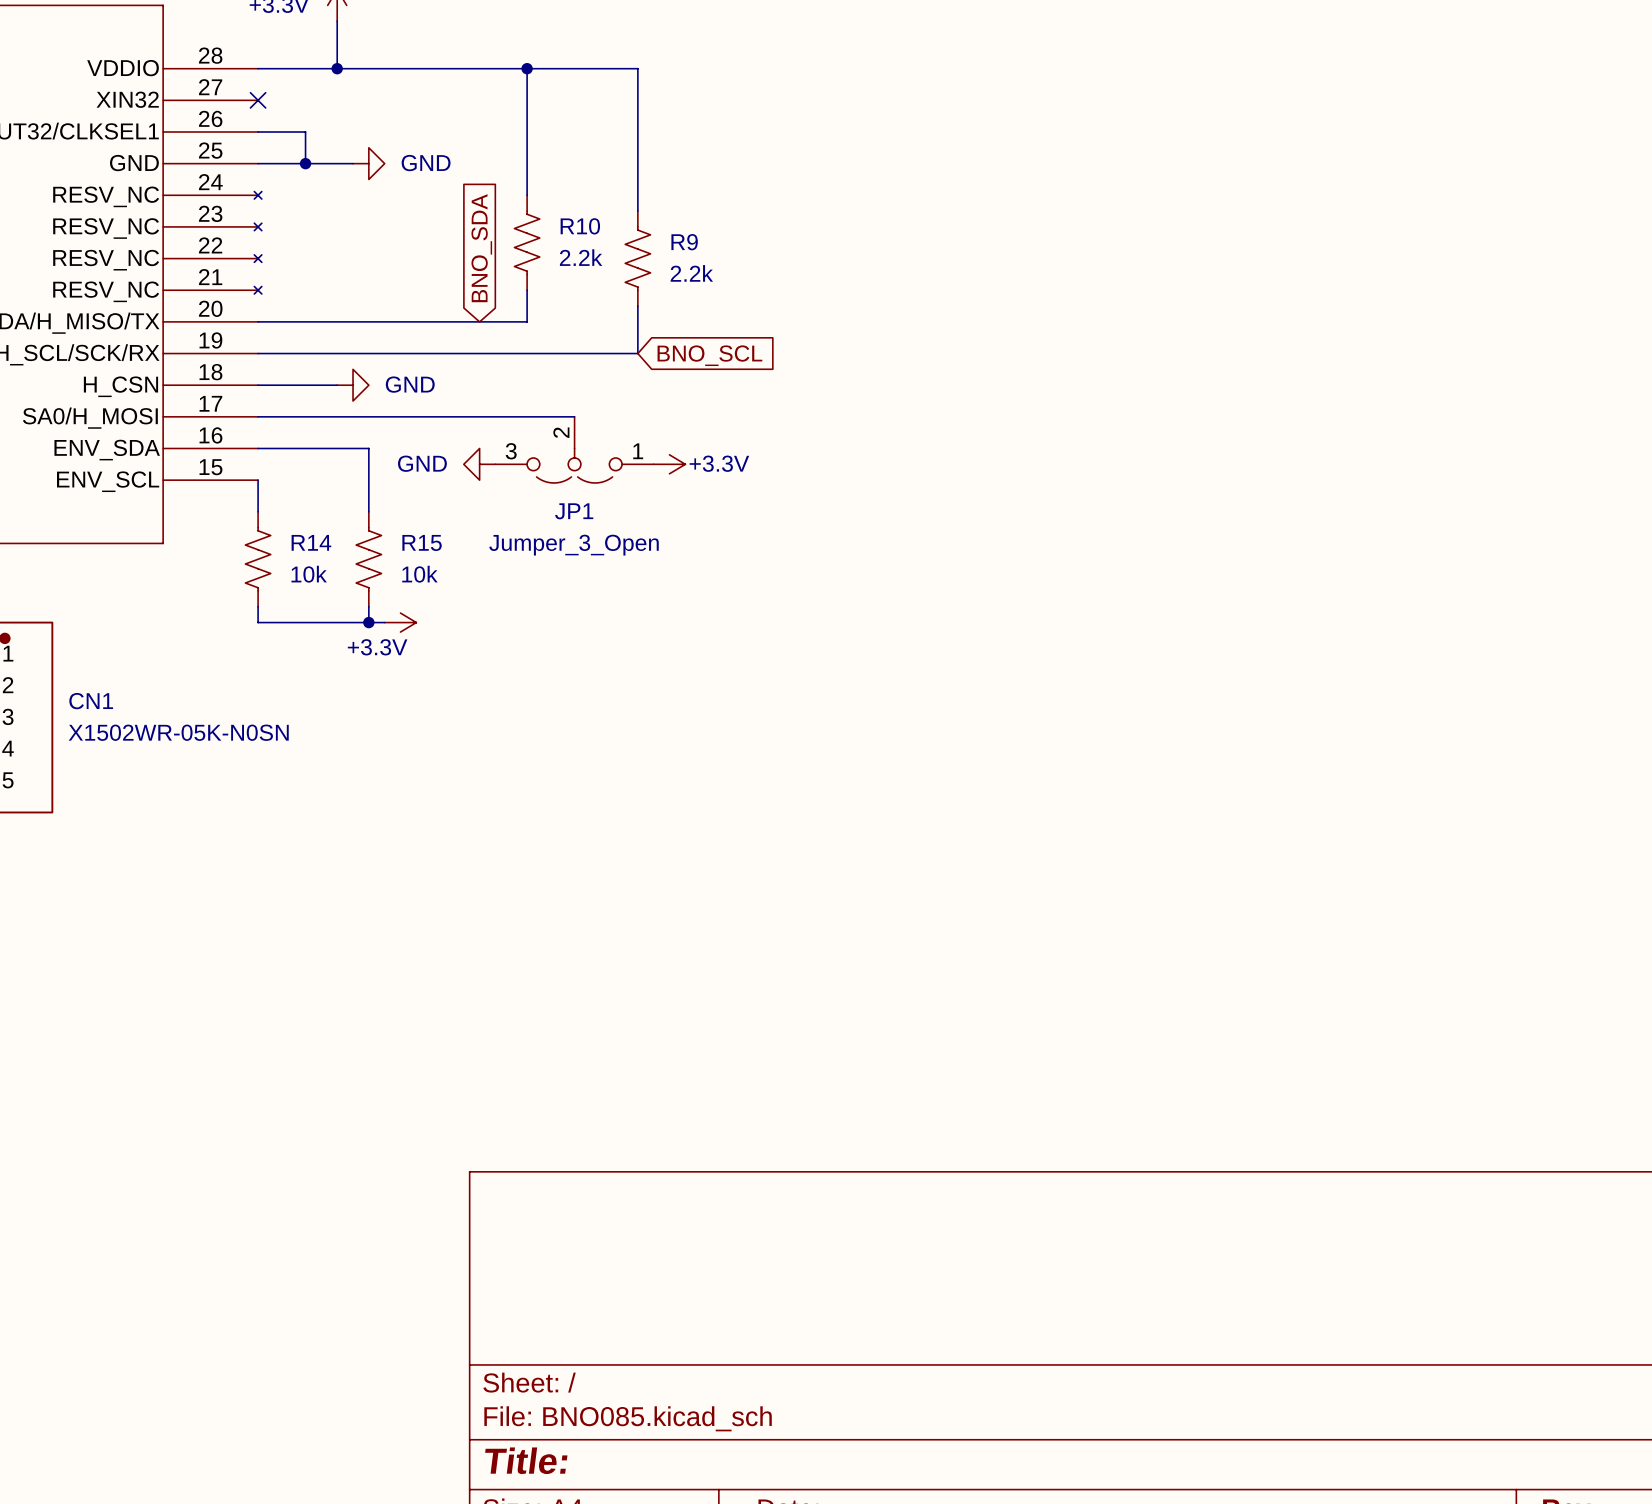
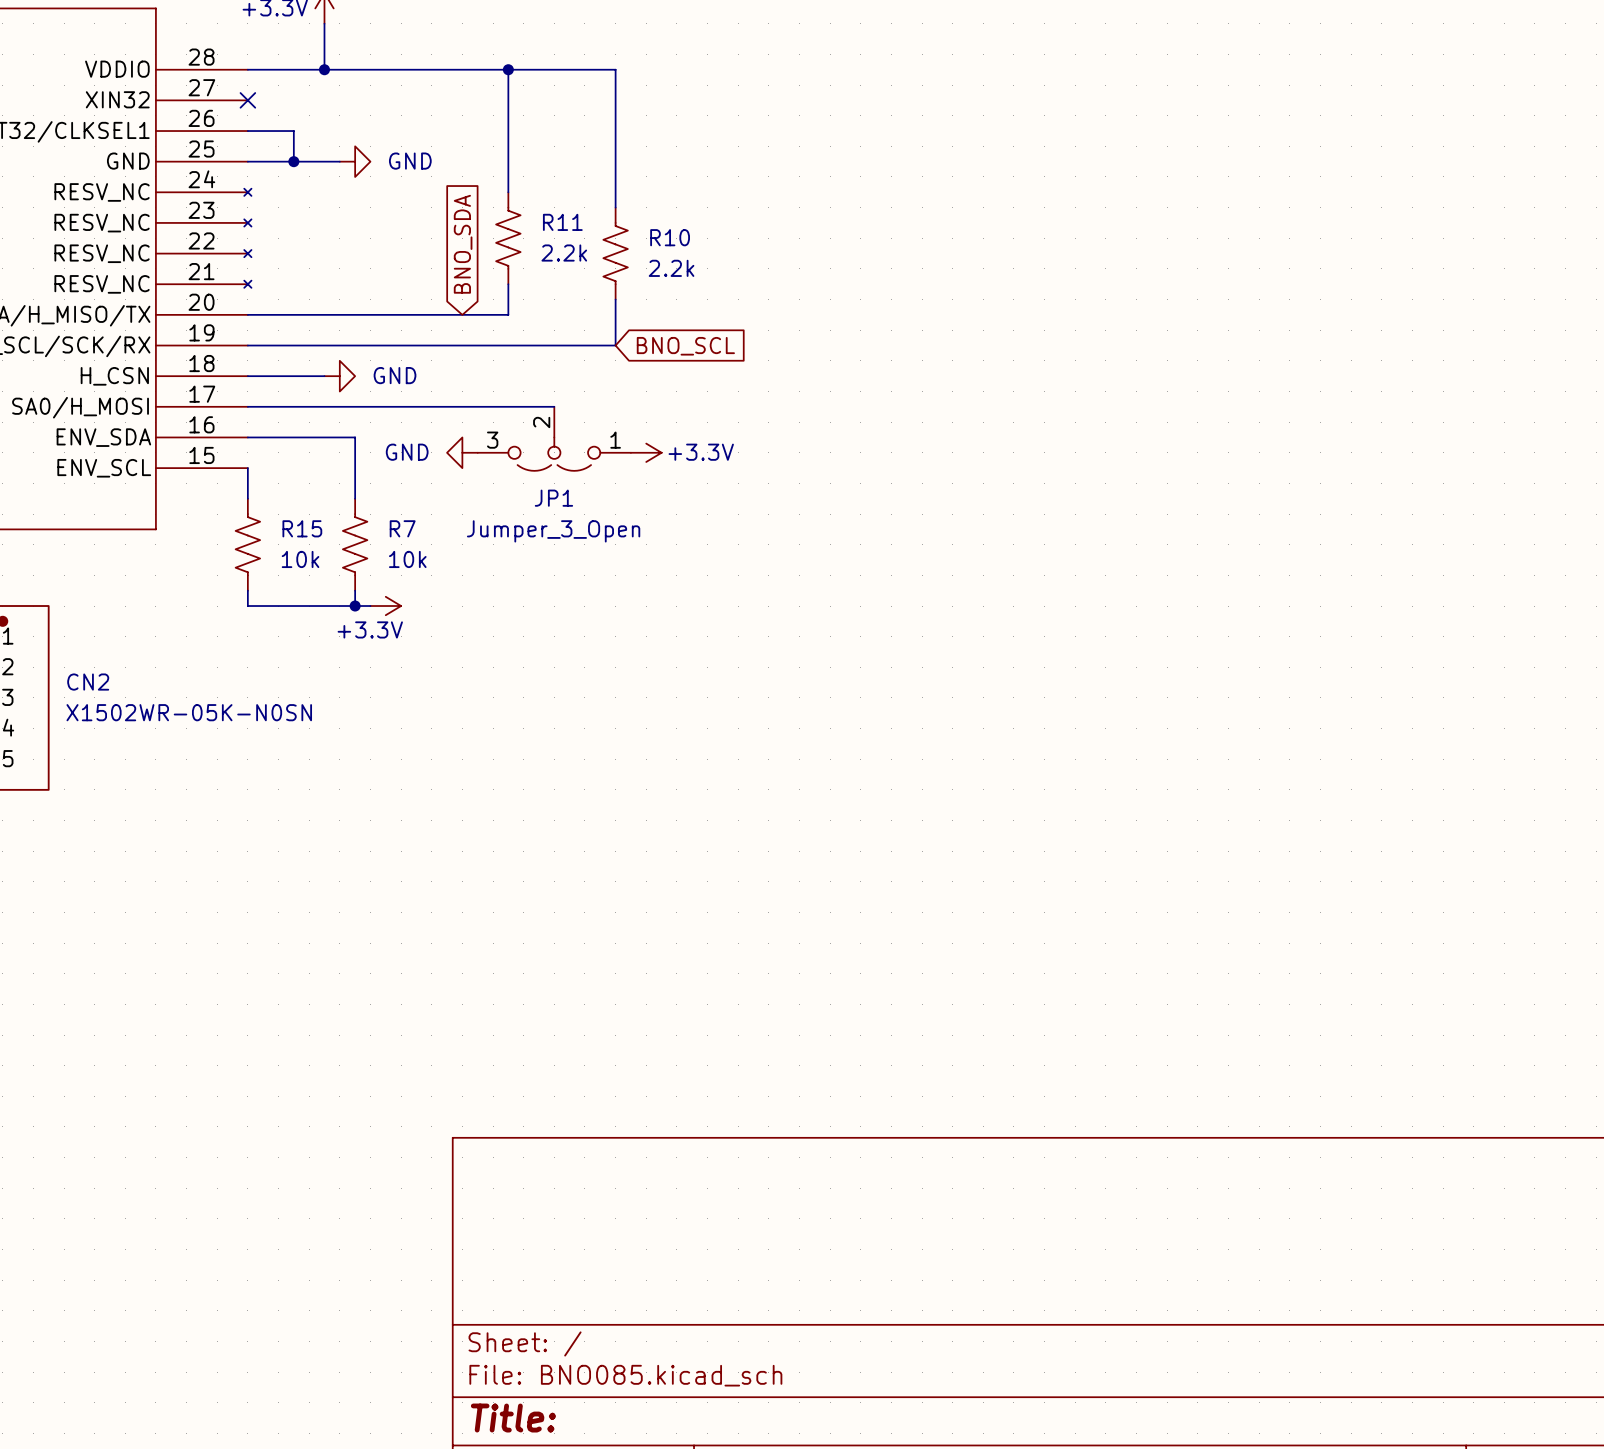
R10 name: R10 (580, 226) -> R11 (562, 222)
R9 name: R9 (684, 242) -> R10 (670, 237)
R14 name: R14 (311, 542) -> R15 (302, 528)
R15 name: R15 (422, 542) -> R7 (402, 528)
CN1 name: CN1 (91, 701) -> CN2 (88, 682)

